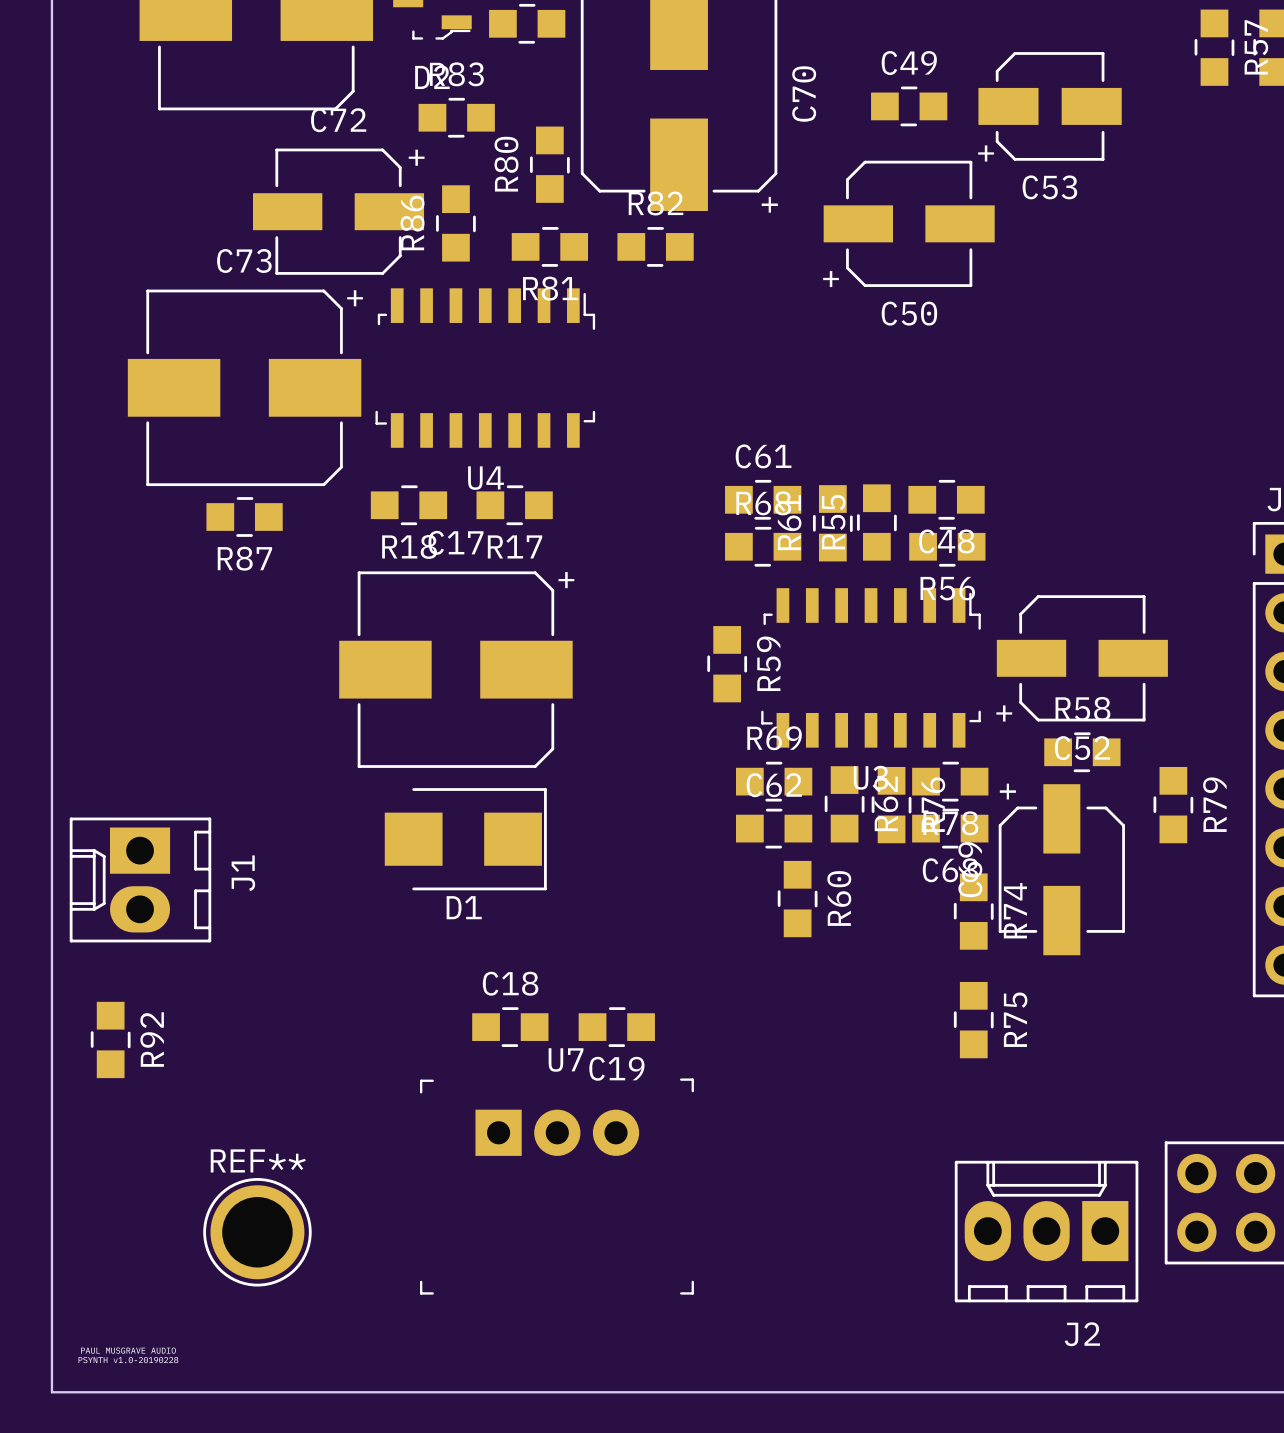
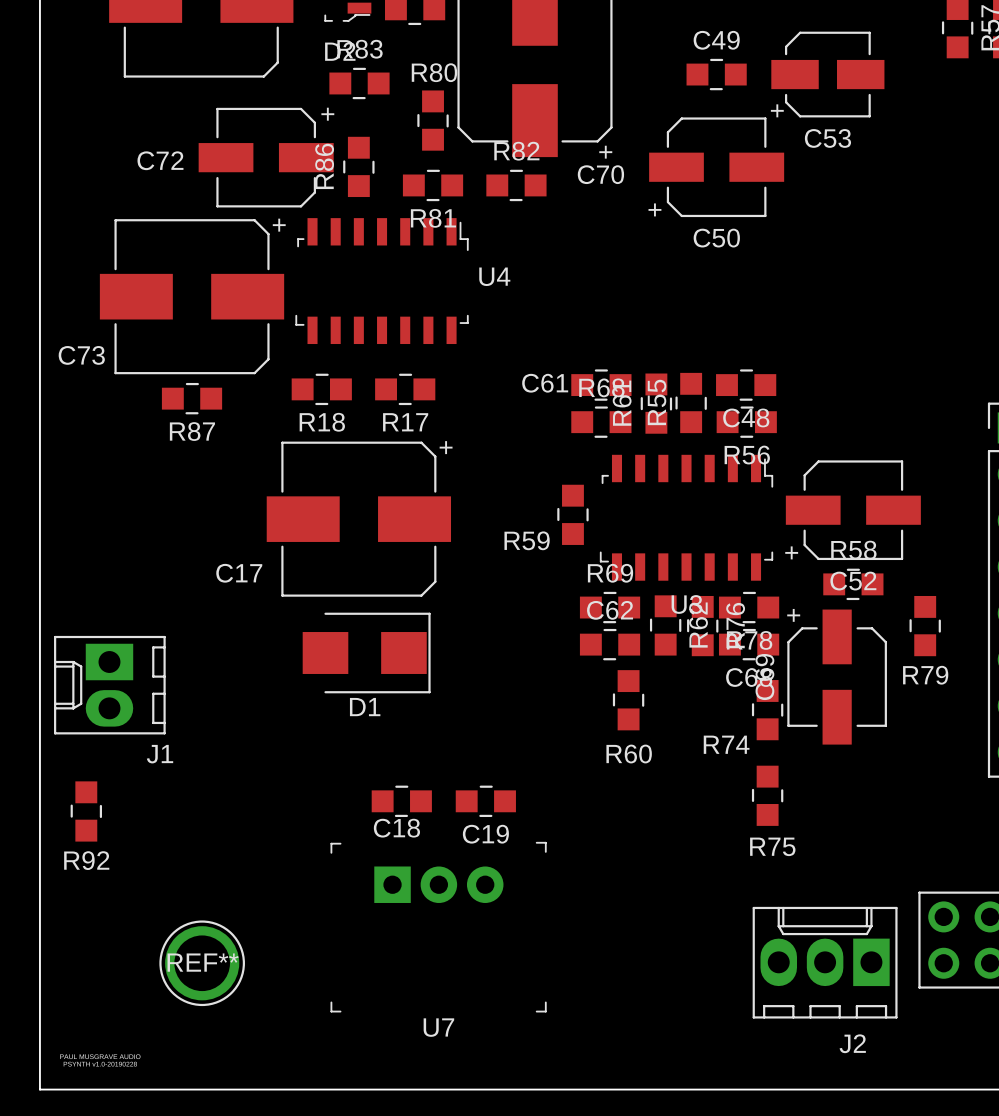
C70 name rotation: 0° (804, 94) -> 90° clockwise (600, 174)
C70 name position: C70 (804, 94) -> C70 (600, 174)
C72 name position: C72 (338, 120) -> C72 (160, 160)
R80 name rotation: 0° (506, 164) -> 90° clockwise (434, 72)
C73 name position: C73 (244, 260) -> C73 (81, 355)
C61 name position: C61 (763, 456) -> C61 (545, 383)
U4 name position: U4 (486, 478) -> U4 (494, 276)
C17 name position: C17 (455, 542) -> C17 (239, 573)
R59 name rotation: 0° (768, 663) -> 90° clockwise (527, 540)
R59 name position: R59 (768, 663) -> R59 (527, 540)
R79 name rotation: 0° (1214, 804) -> 90° clockwise (925, 675)
J1 name rotation: 0° (243, 873) -> 90° clockwise (160, 754)
J1 name position: J1 (243, 873) -> J1 (160, 754)
R60 name rotation: 0° (839, 898) -> 90° clockwise (629, 754)
R60 name position: R60 (839, 898) -> R60 (629, 754)
R74 name rotation: 0° (1015, 910) -> 90° clockwise (726, 744)
R74 name position: R74 (1015, 910) -> R74 (726, 744)
C18 name position: C18 (510, 983) -> C18 (396, 828)
R75 name rotation: 0° (1015, 1019) -> 90° clockwise (772, 846)
R92 name rotation: 0° (152, 1039) -> 90° clockwise (86, 860)
U7 name position: U7 (566, 1060) -> U7 (438, 1027)
REF** name position: REF** (258, 1160) -> REF** (203, 962)

